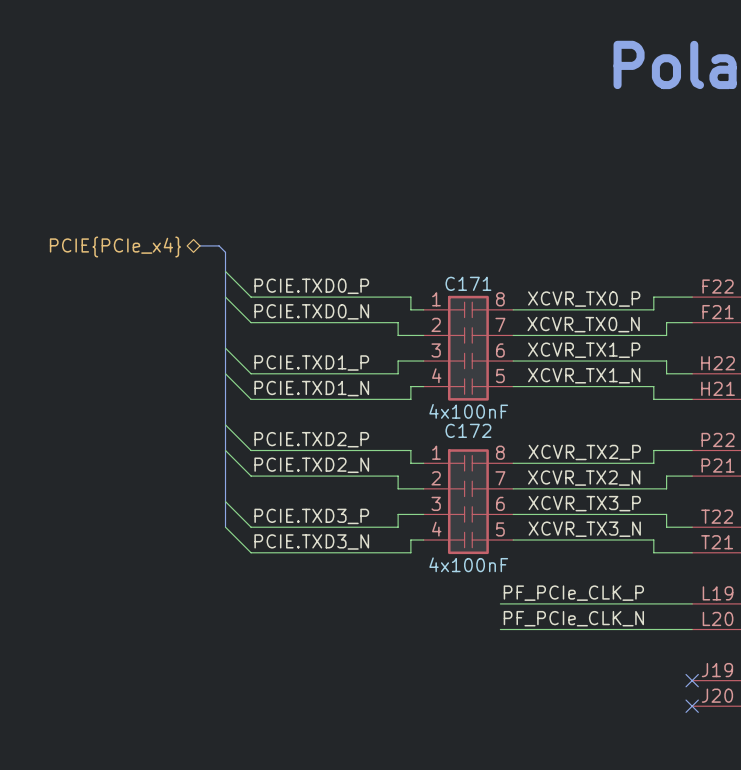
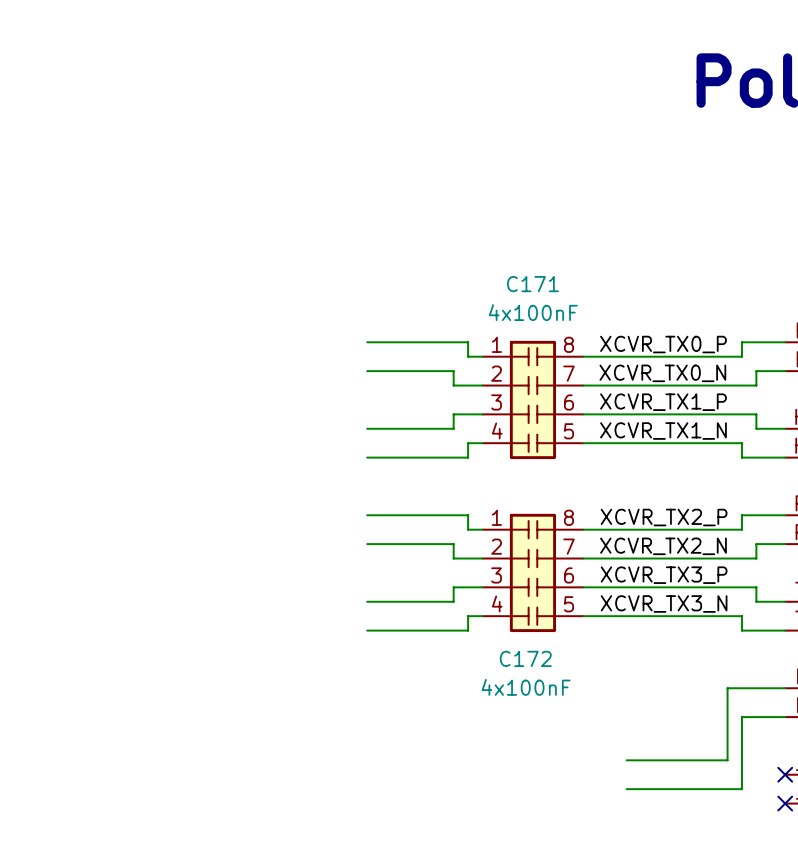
bus: (199, 245) (219, 245) (225, 252) (225, 527) -> none
hierarchical label: PCIE{PCIe_x4} (115, 246) -> none
wire: (225, 271) (251, 297) (321, 297) -> none
C171 name position: C171 (468, 283) -> C171 (532, 284)
label: PCIE.TXD0_P (311, 286) -> none
wire: (225, 297) (251, 322) (321, 322) -> none
label: PCIE.TXD0_N (311, 311) -> none
wire: (225, 348) (251, 373) (321, 373) -> none
label: PCIE.TXD1_P (311, 363) -> none
wire: (225, 373) (251, 399) (321, 399) -> none
label: PCIE.TXD1_N (311, 388) -> none
C171 text position: 4x100nF (468, 411) -> 4x100nF (533, 312)
wire: (225, 424) (251, 450) (321, 450) -> none
C172 name position: C172 (468, 430) -> C172 (525, 658)
label: PCIE.TXD2_P (311, 439) -> none
wire: (225, 450) (251, 476) (321, 476) -> none
label: PCIE.TXD2_N (311, 465) -> none
wire: (225, 501) (251, 527) (321, 527) -> none
label: PCIE.TXD3_P (311, 516) -> none
wire: (225, 527) (251, 552) (321, 552) -> none
label: PCIE.TXD3_N (311, 541) -> none
C172 text position: 4x100nF (468, 564) -> 4x100nF (526, 687)
label: PF_PCIe_CLK_P (573, 593) -> none
wire: (500, 603) (641, 603) -> (626, 760) (727, 760) (727, 688)
label: PF_PCIe_CLK_N (573, 618) -> none
wire: (500, 629) (653, 629) -> (626, 789) (741, 789) (741, 717)

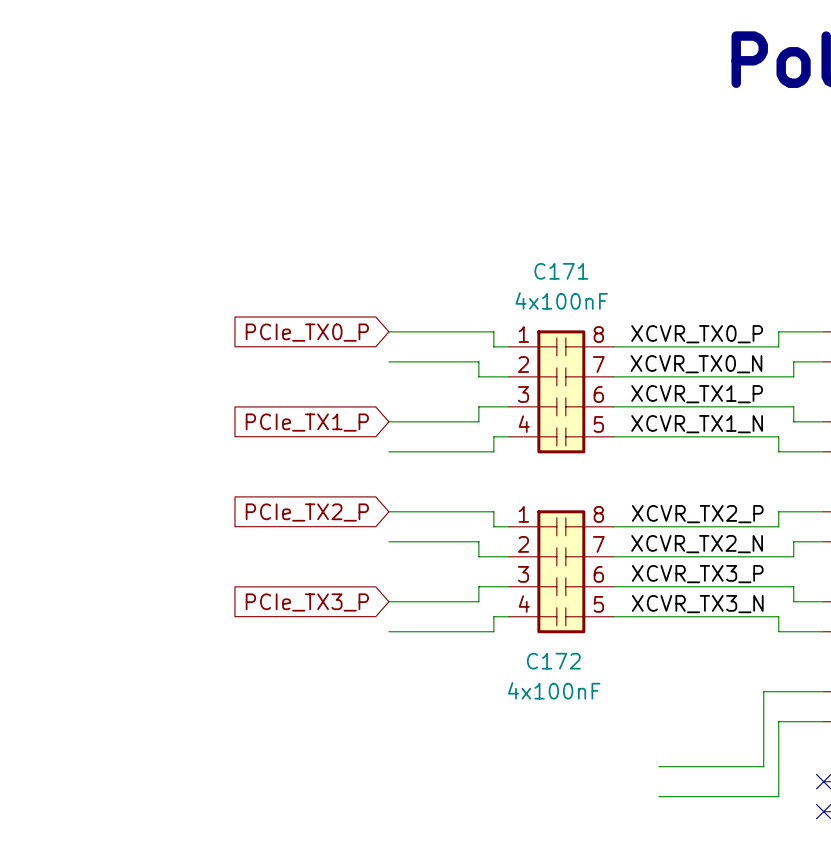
global label: none -> PCIe_TX0_P (307, 332)
global label: none -> PCIe_TX1_P (307, 422)
global label: none -> PCIe_TX2_P (307, 512)
global label: none -> PCIe_TX3_P (307, 602)

